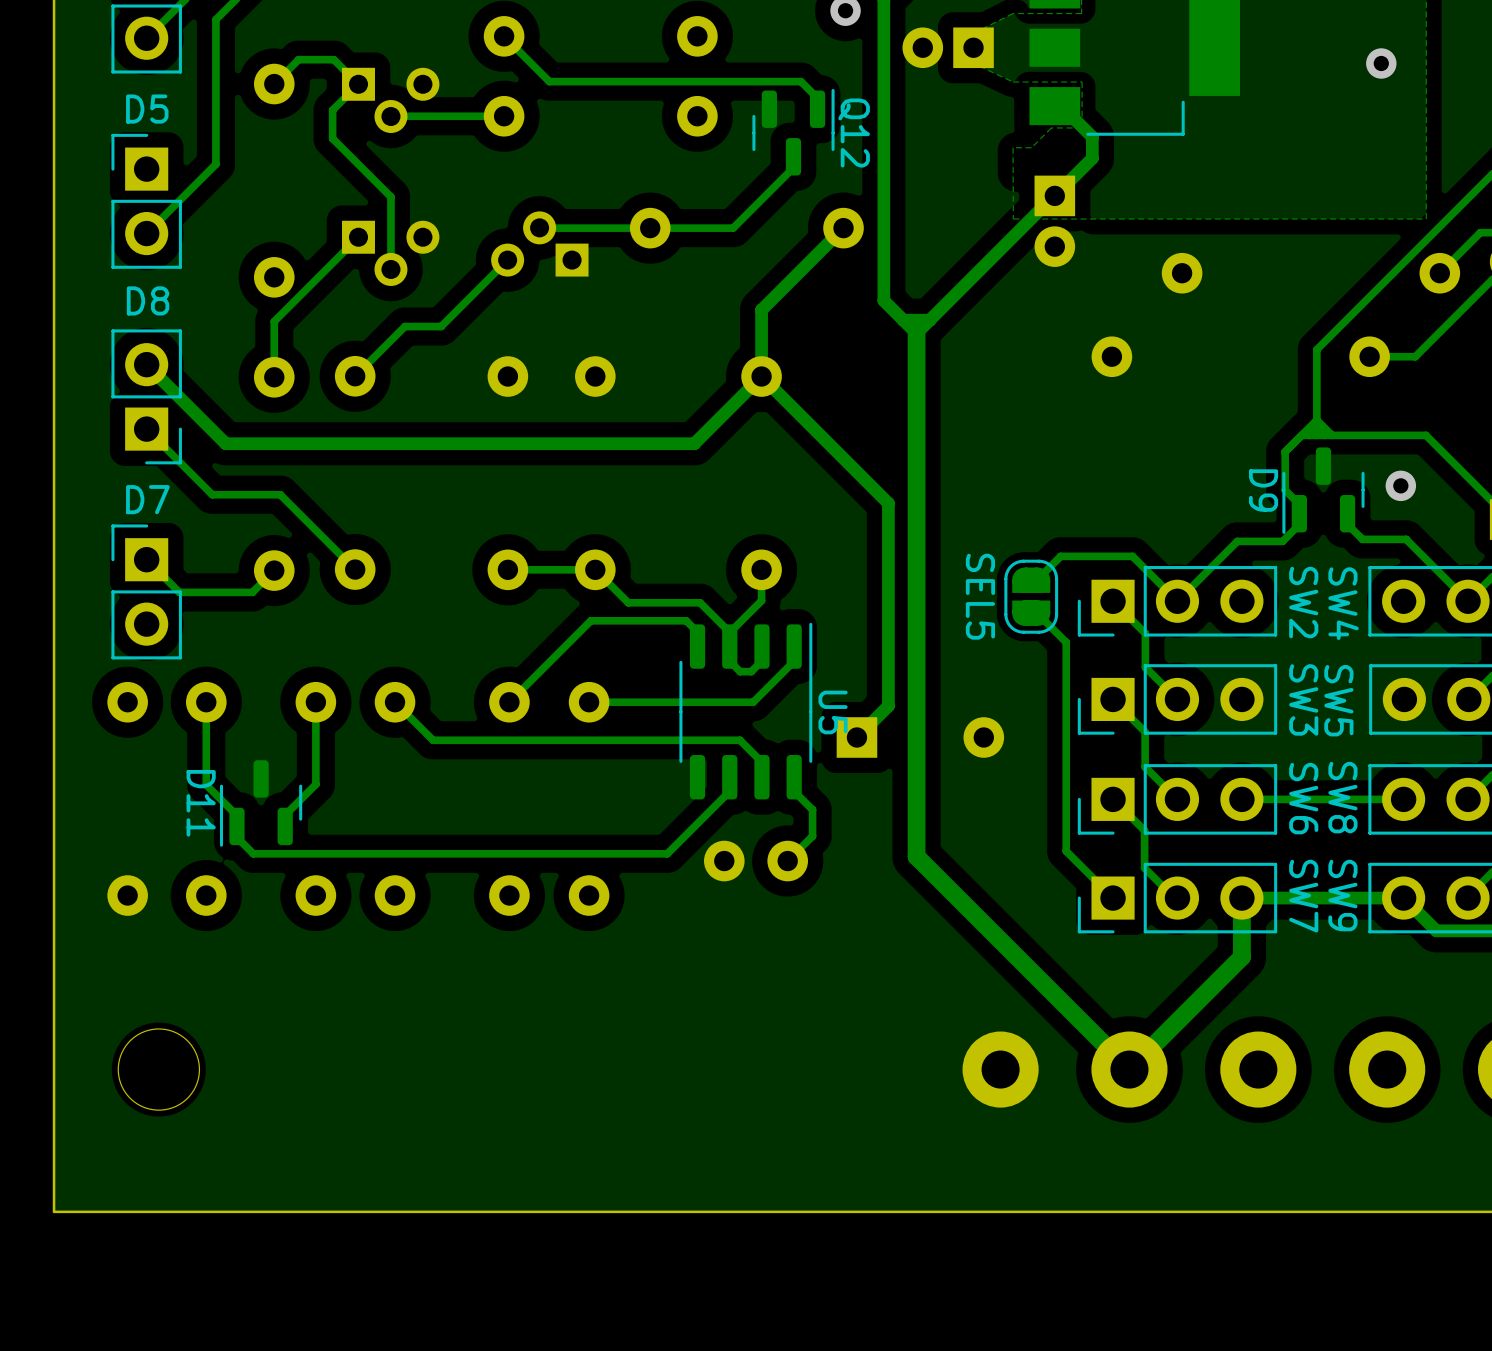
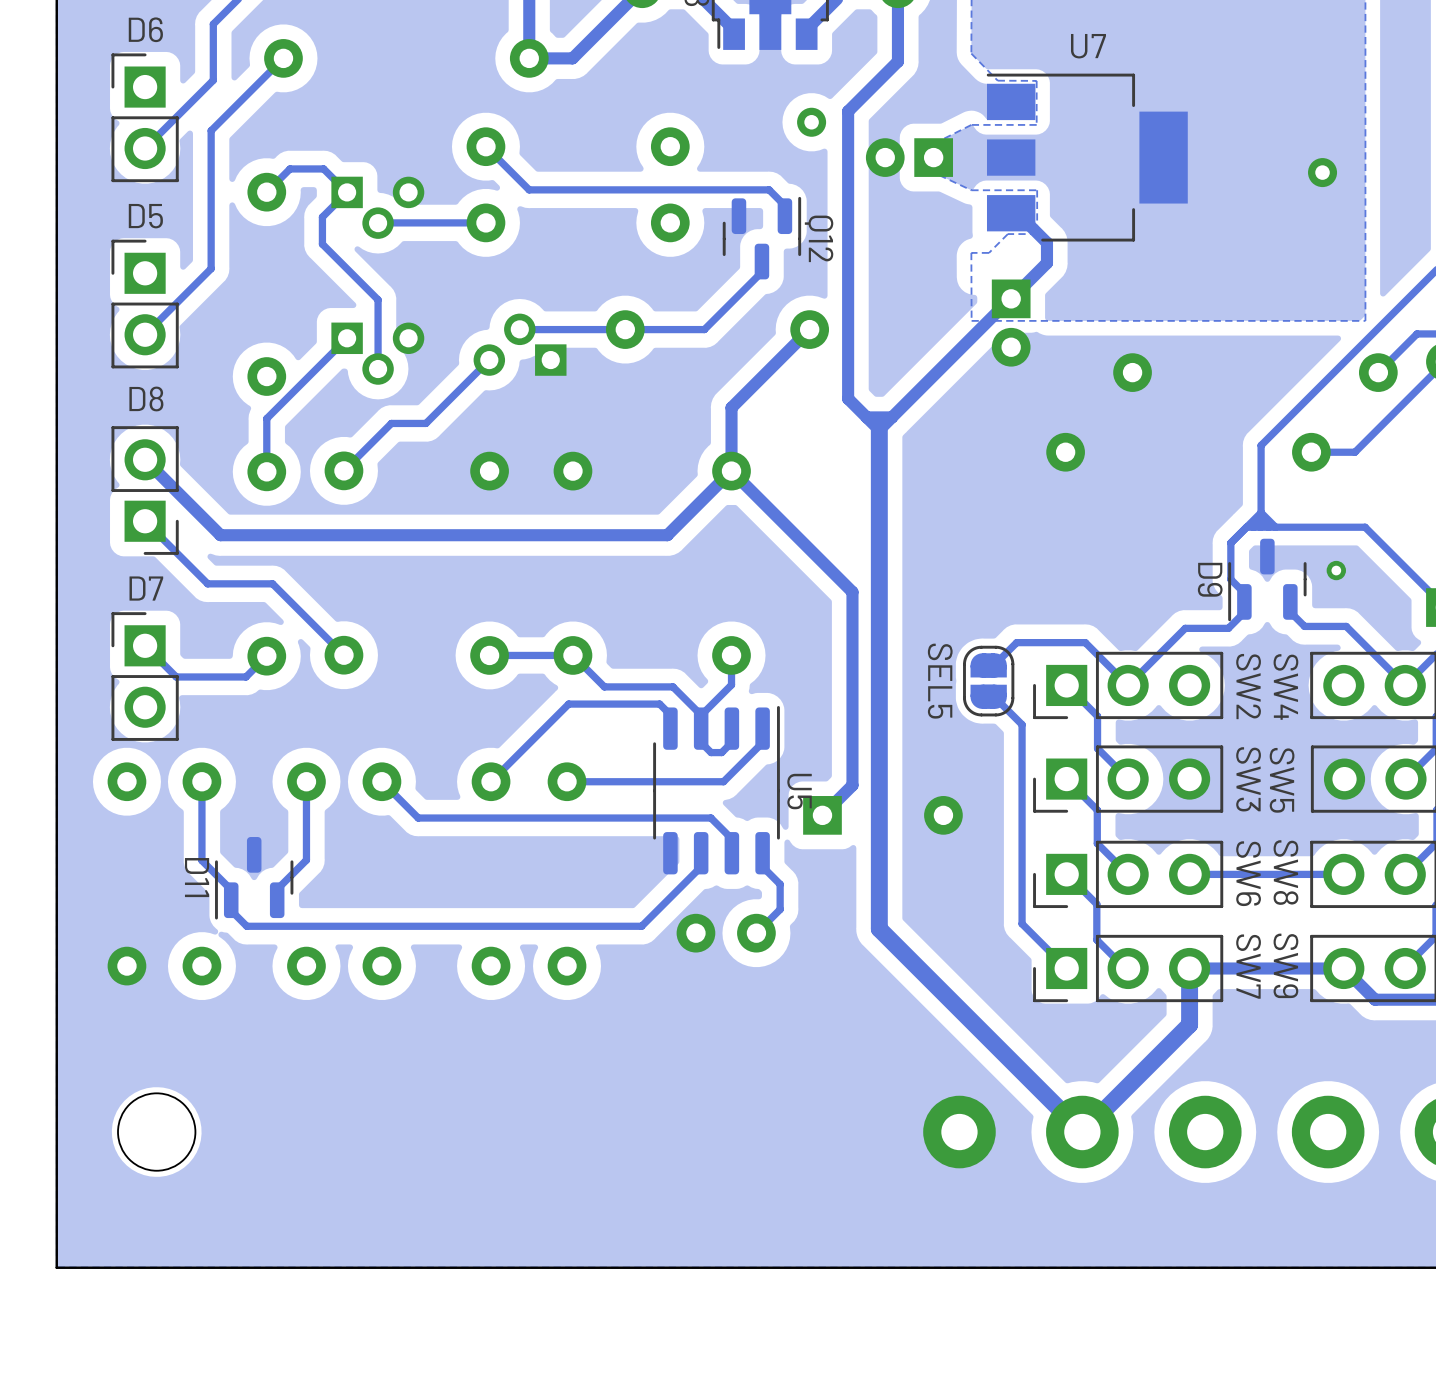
via size: [1385, 470, 1417, 502] -> [1326, 560, 1347, 581]

